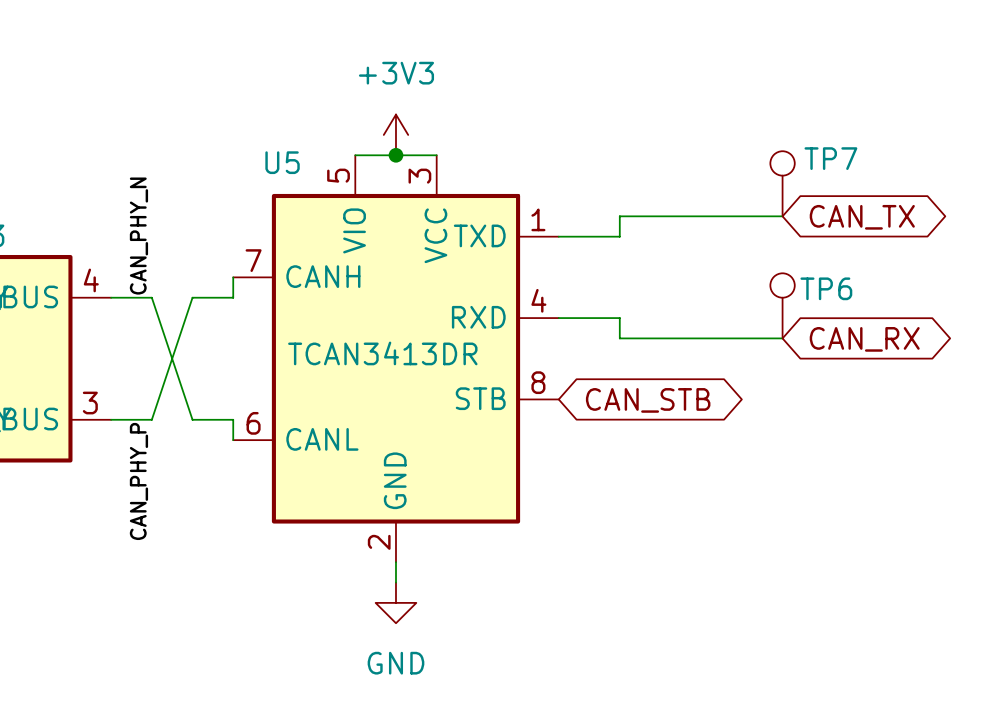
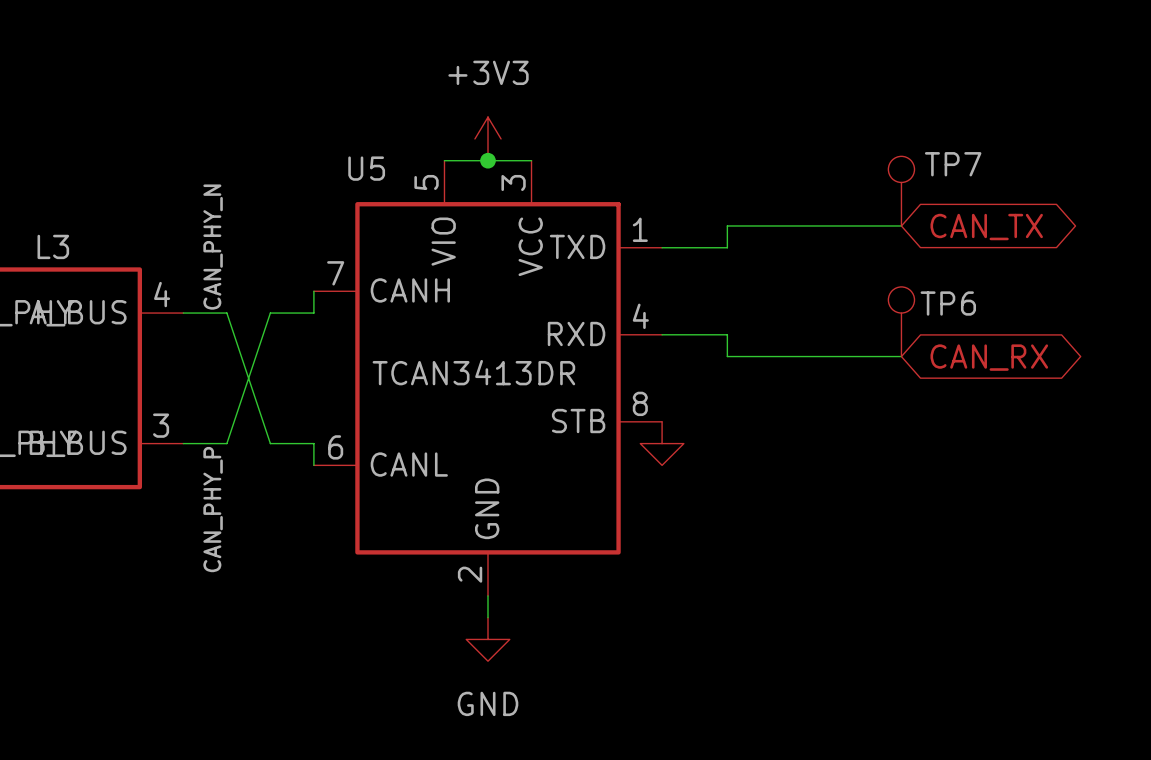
global label: CAN_STB (648, 400) -> none
power symbol: none -> (662, 443)

